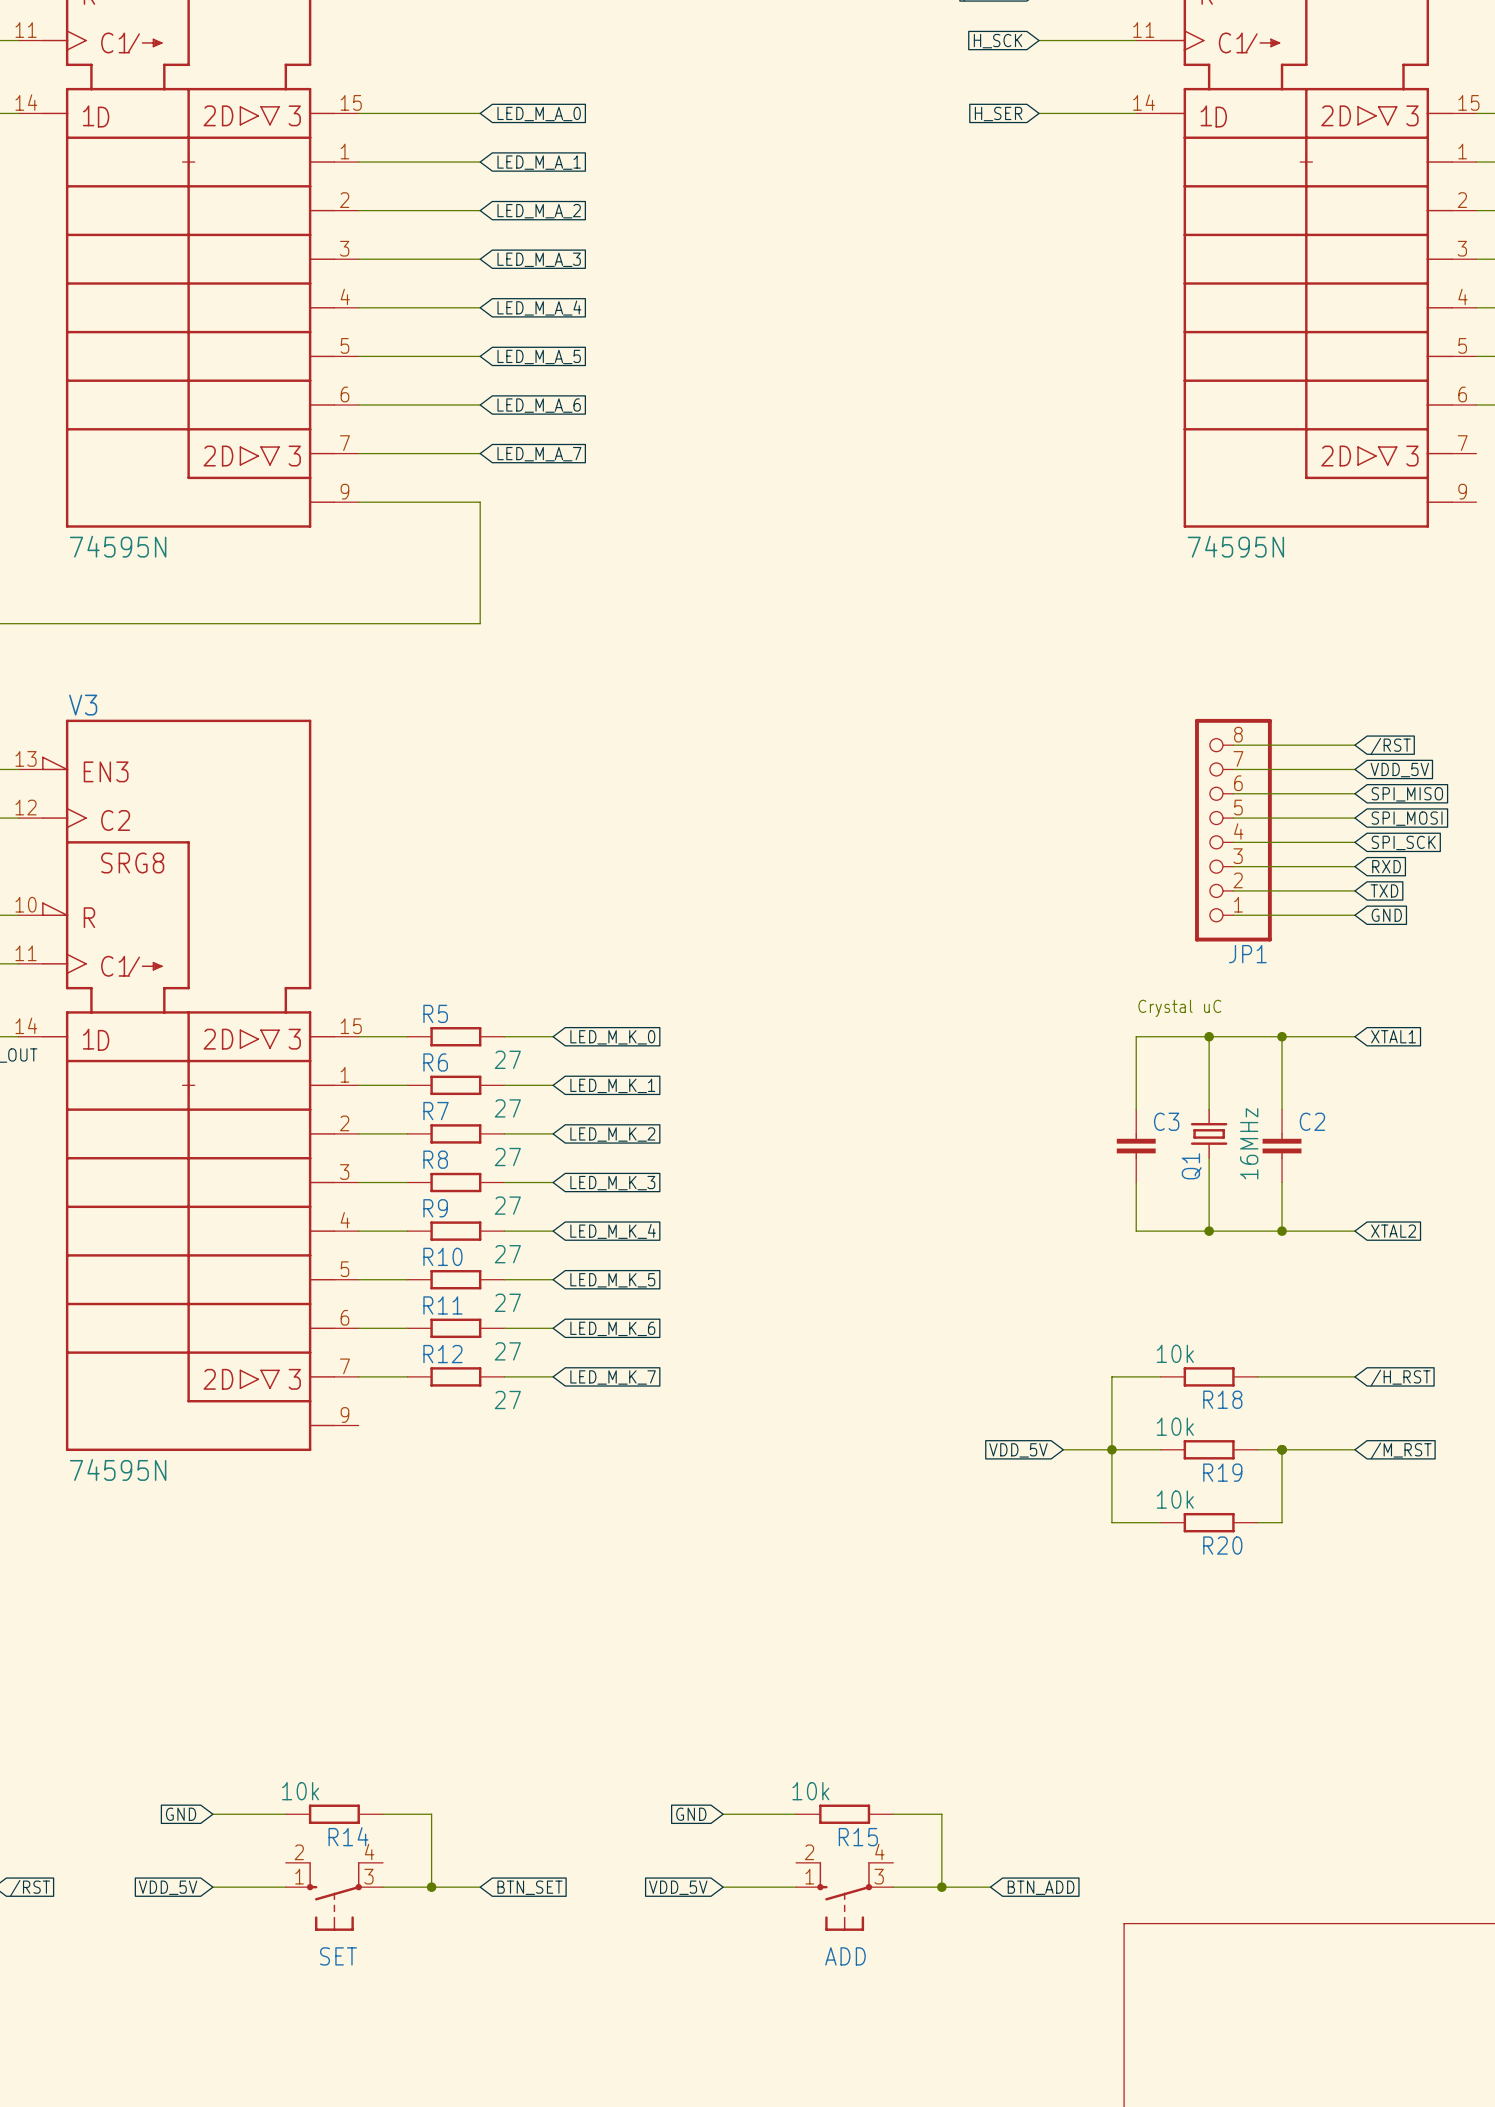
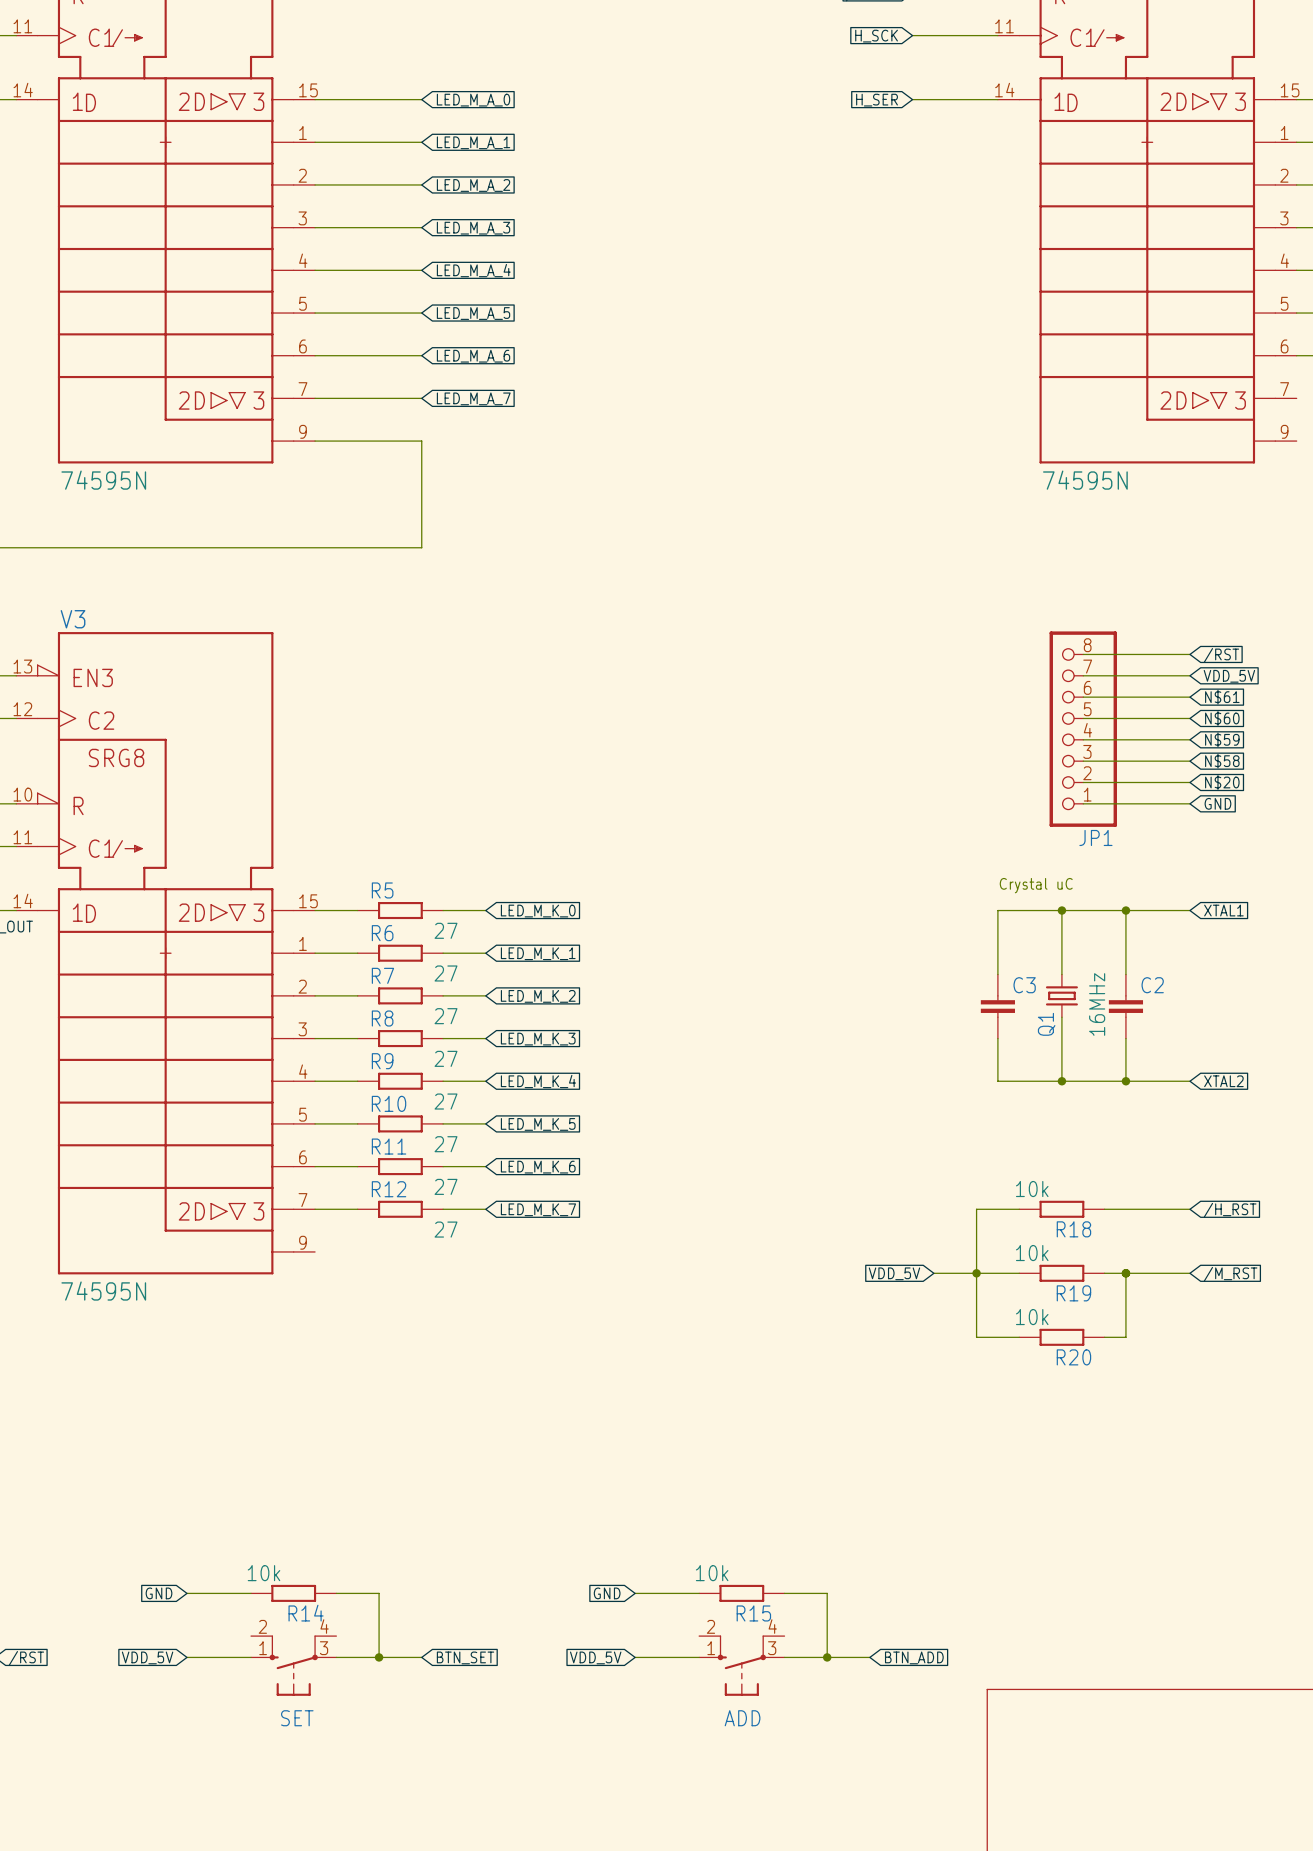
global label: SPI_MISO (1407, 794) -> N$61 (1222, 697)
global label: SPI_MOSI (1407, 818) -> N$60 (1222, 718)
global label: SPI_SCK (1403, 842) -> N$59 (1222, 739)
global label: RXD (1386, 866) -> N$58 (1222, 761)
global label: TXD (1384, 890) -> N$20 (1222, 782)

